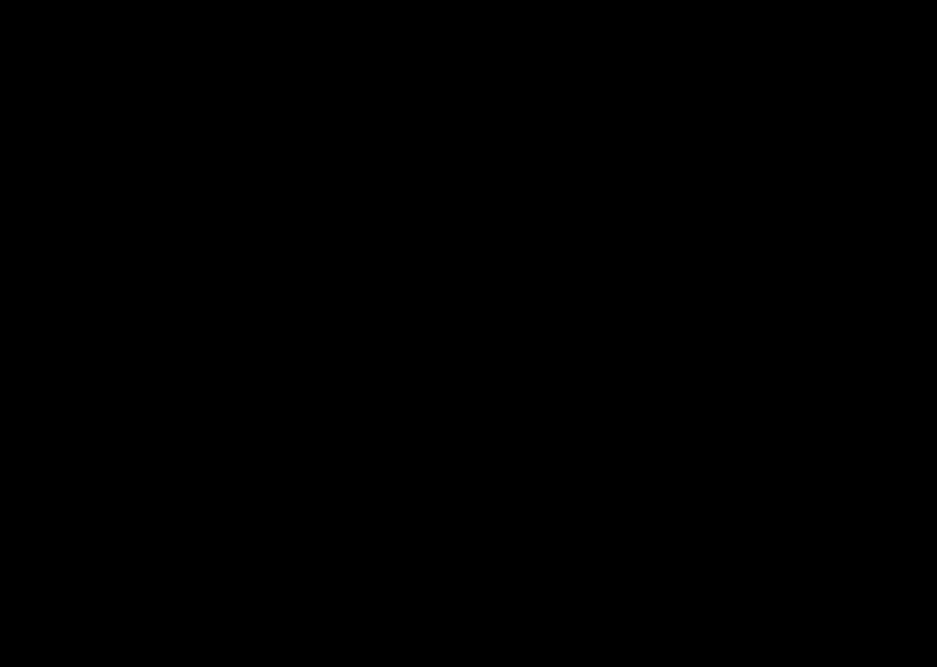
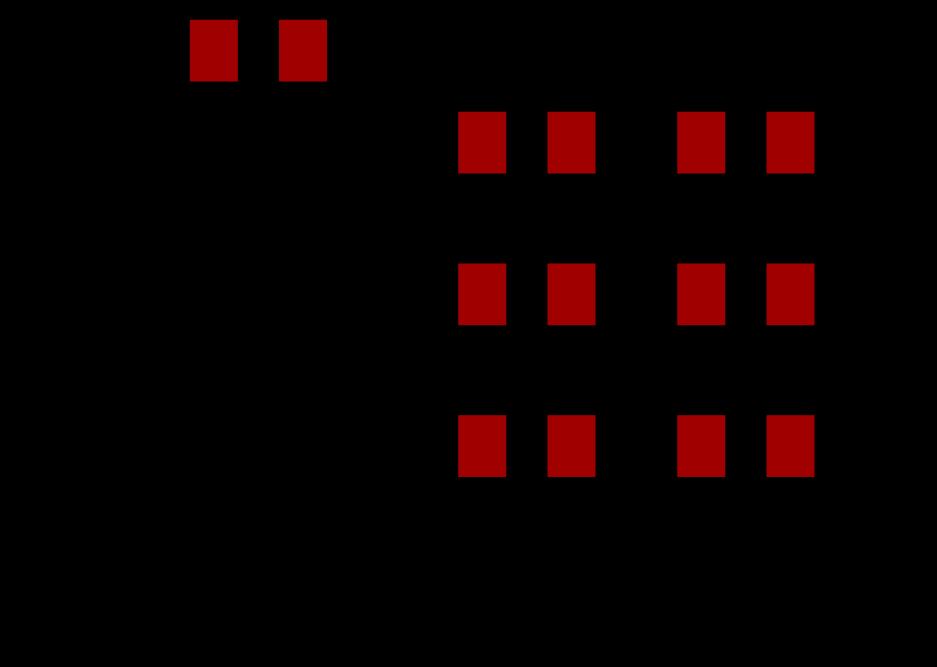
part: none -> (258, 50)
part: none -> (526, 142)
part: none -> (745, 142)
part: none -> (526, 294)
part: none -> (745, 294)
part: none -> (526, 446)
part: none -> (745, 446)

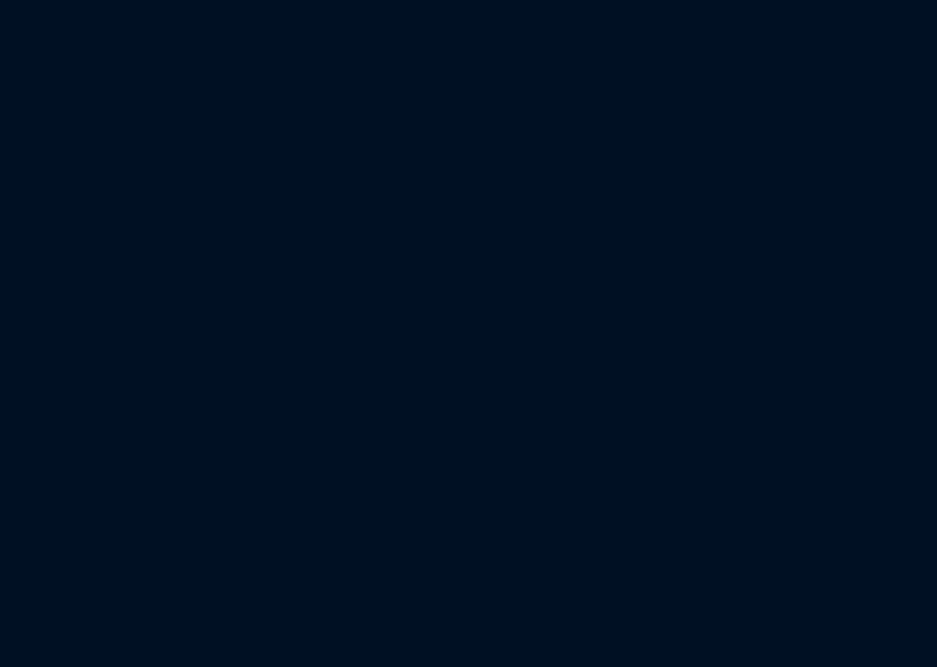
part: (258, 50) -> none
part: (526, 142) -> none
part: (745, 142) -> none
part: (526, 294) -> none
part: (745, 294) -> none
part: (526, 446) -> none
part: (745, 446) -> none

